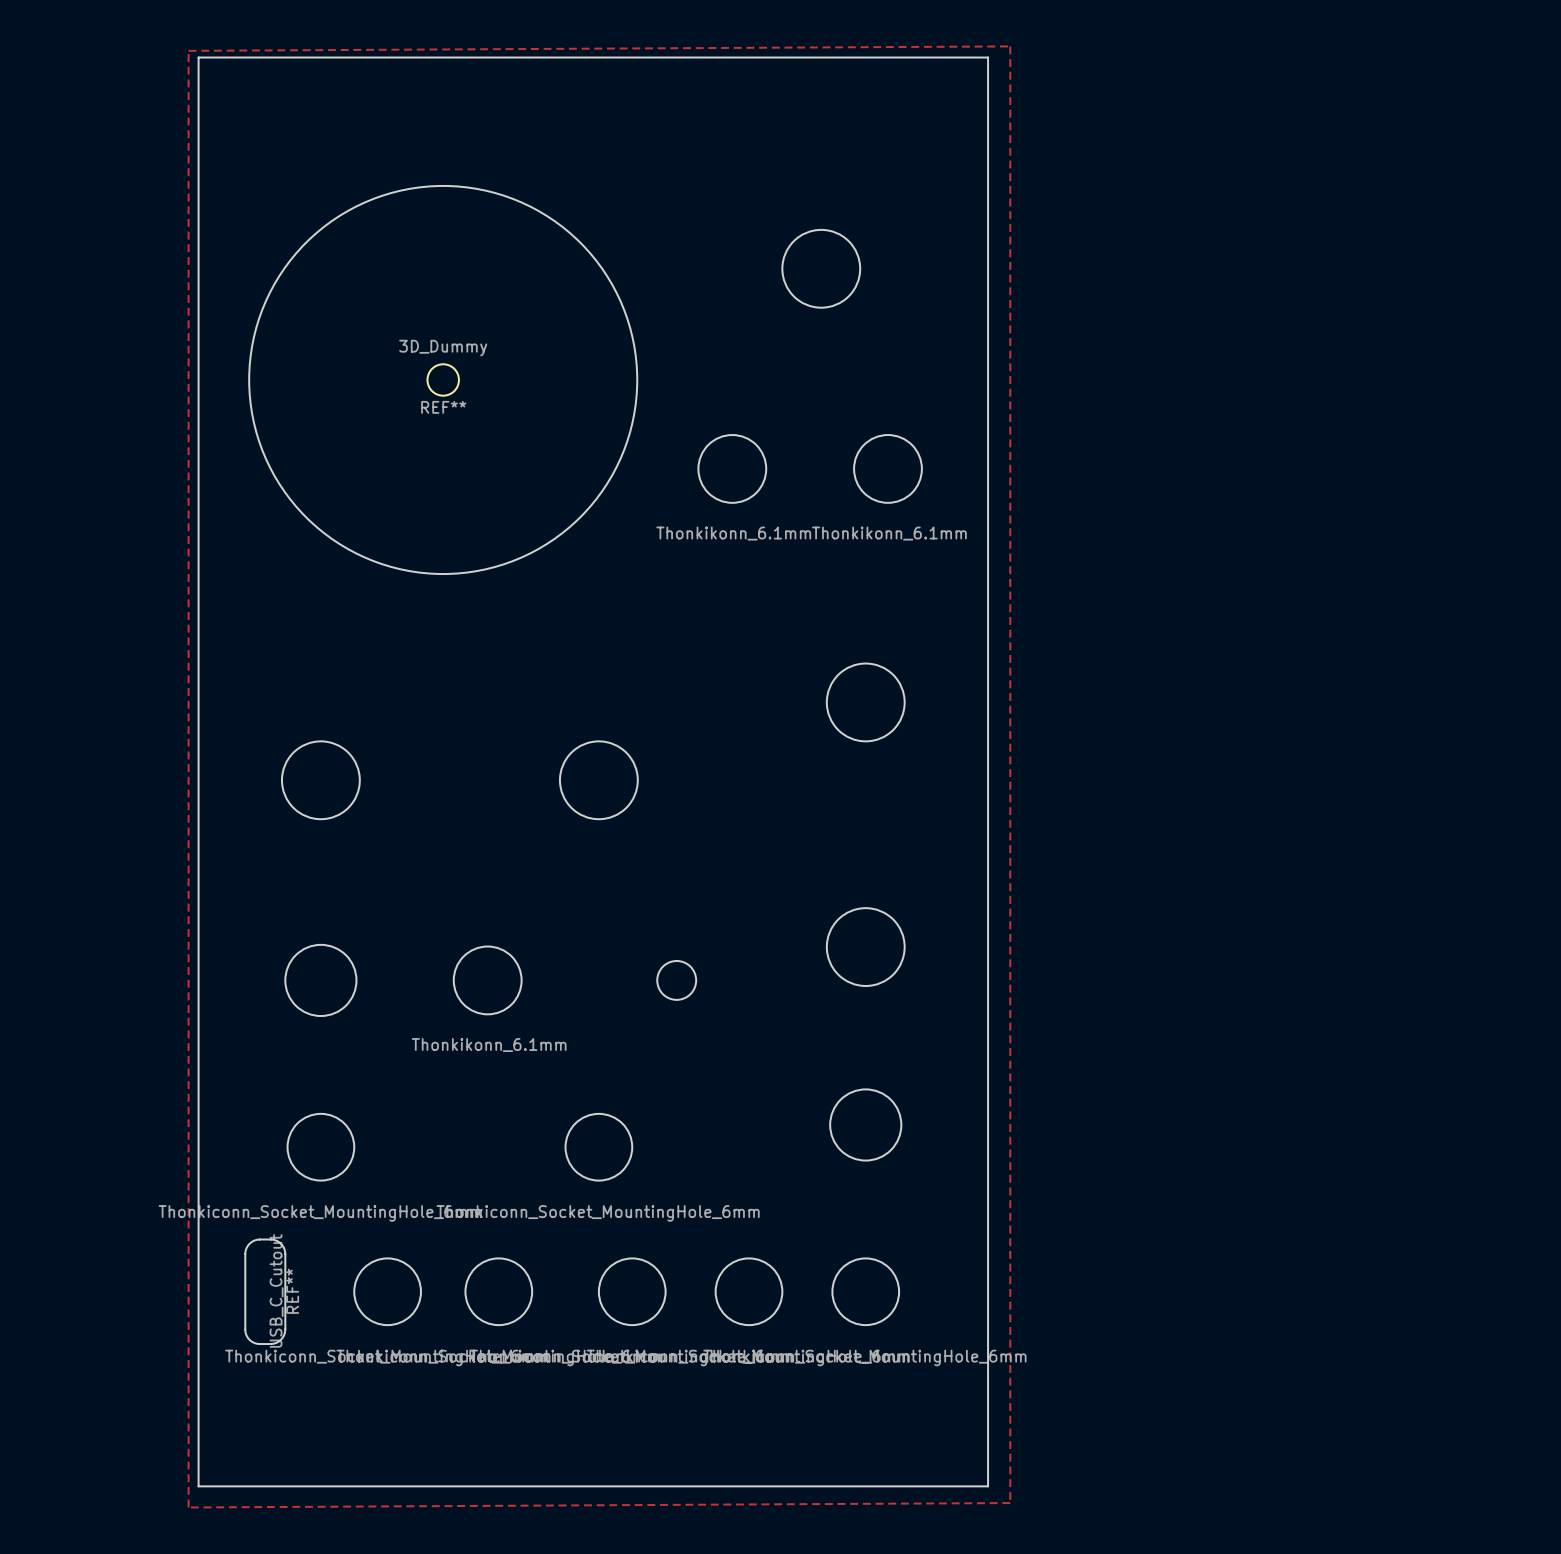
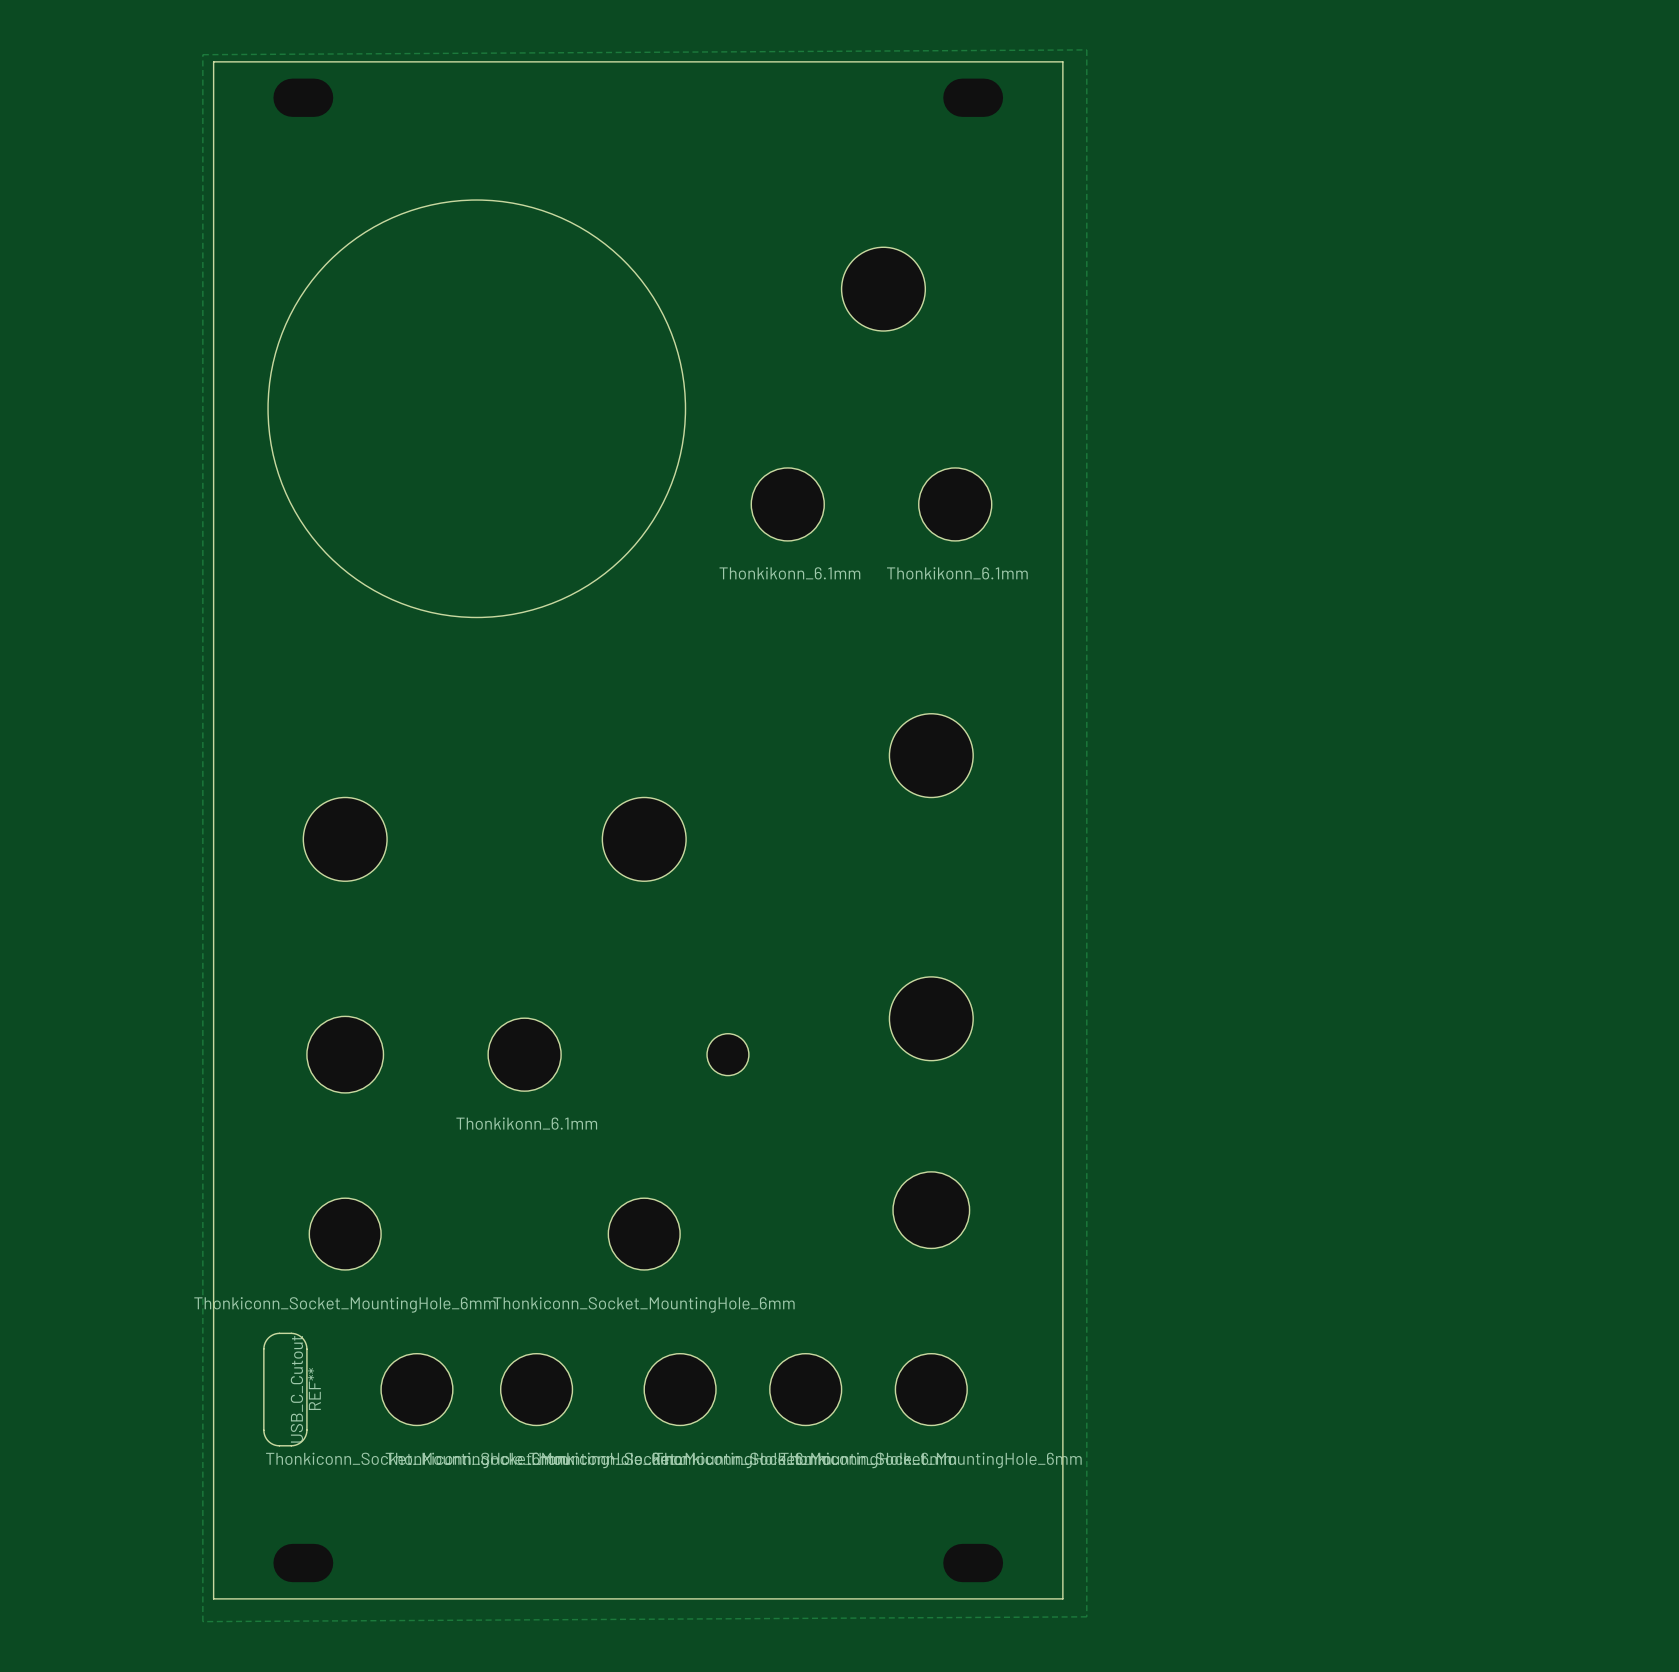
REF**: 3D_Dummy (443, 379) -> none

